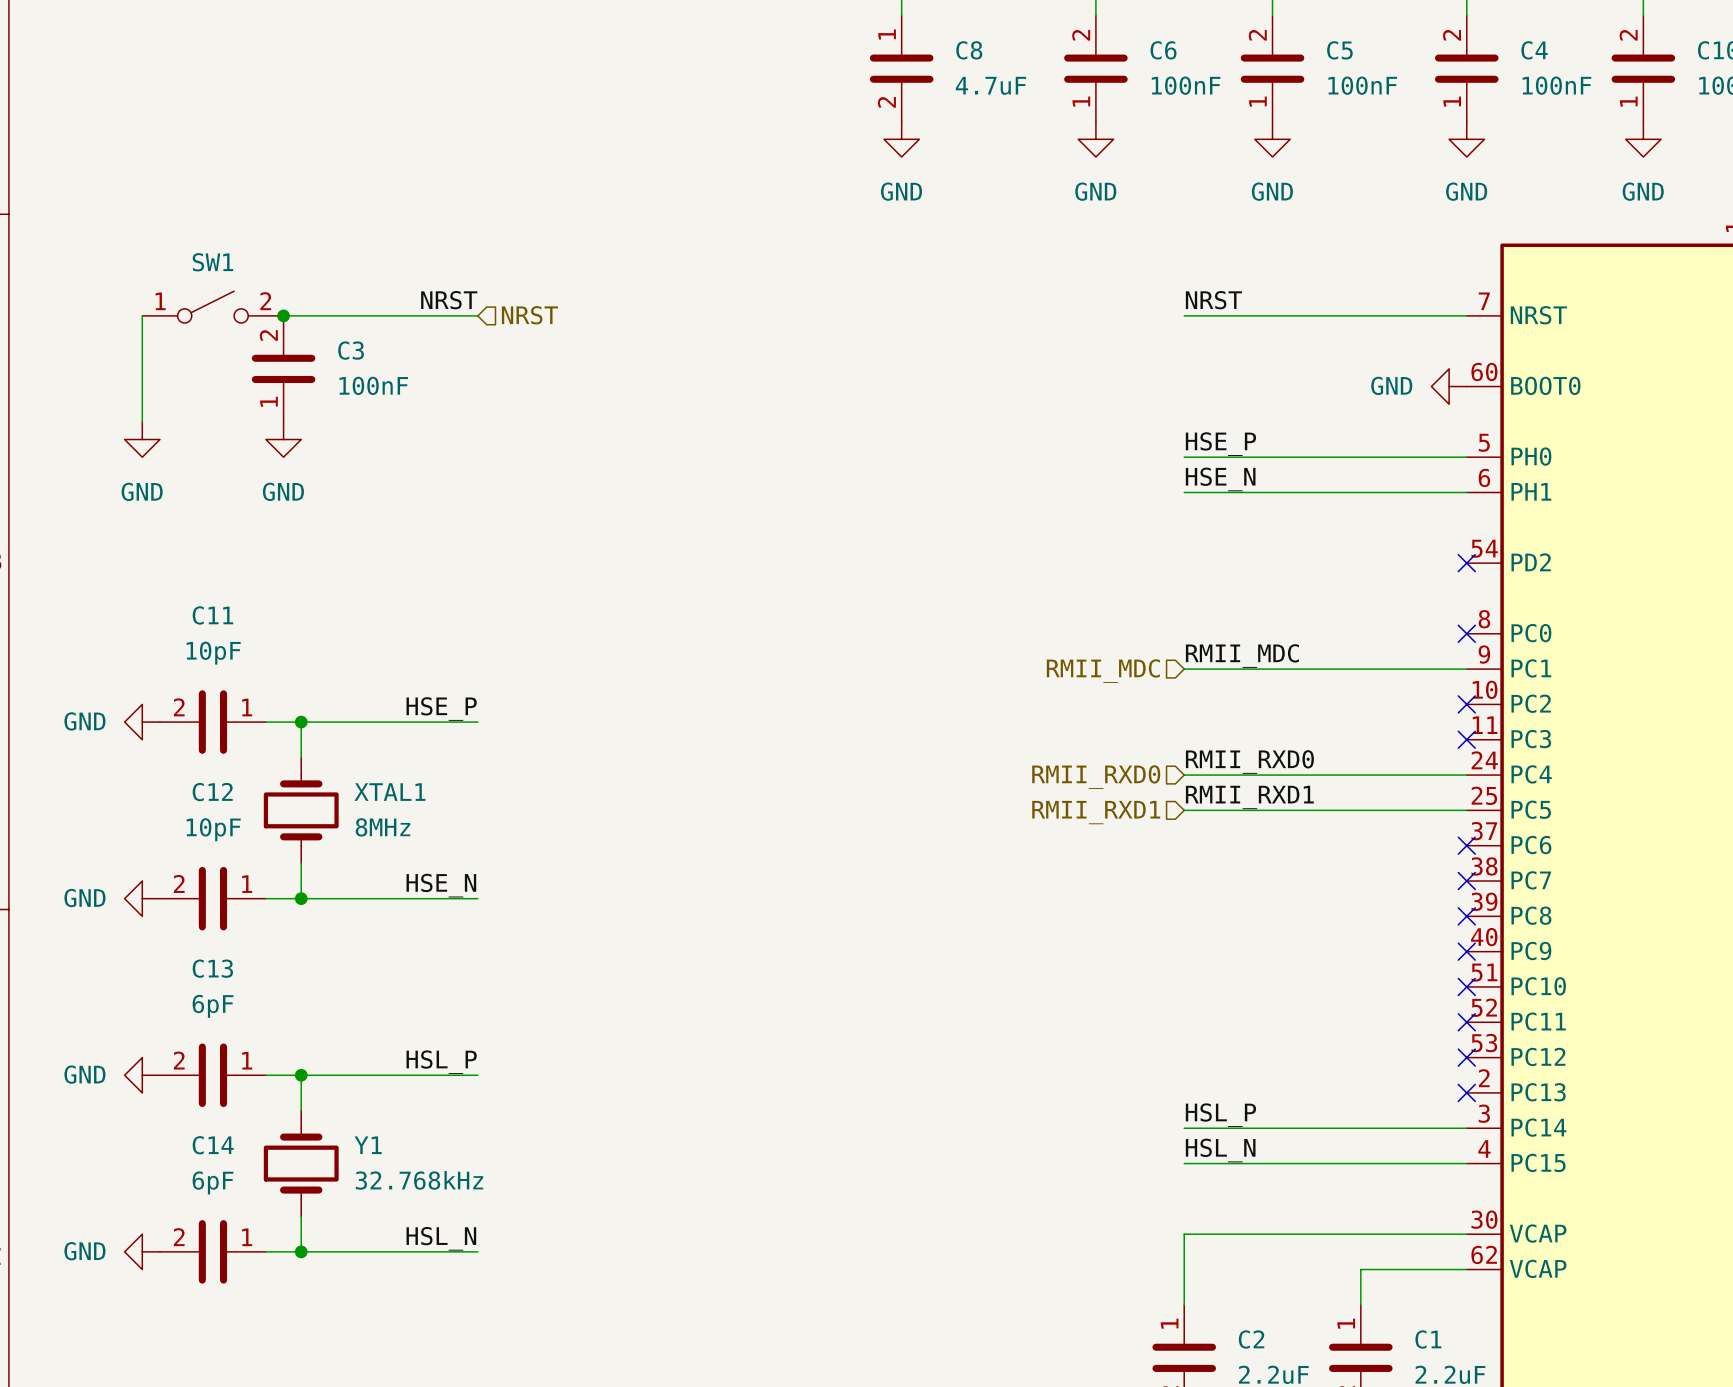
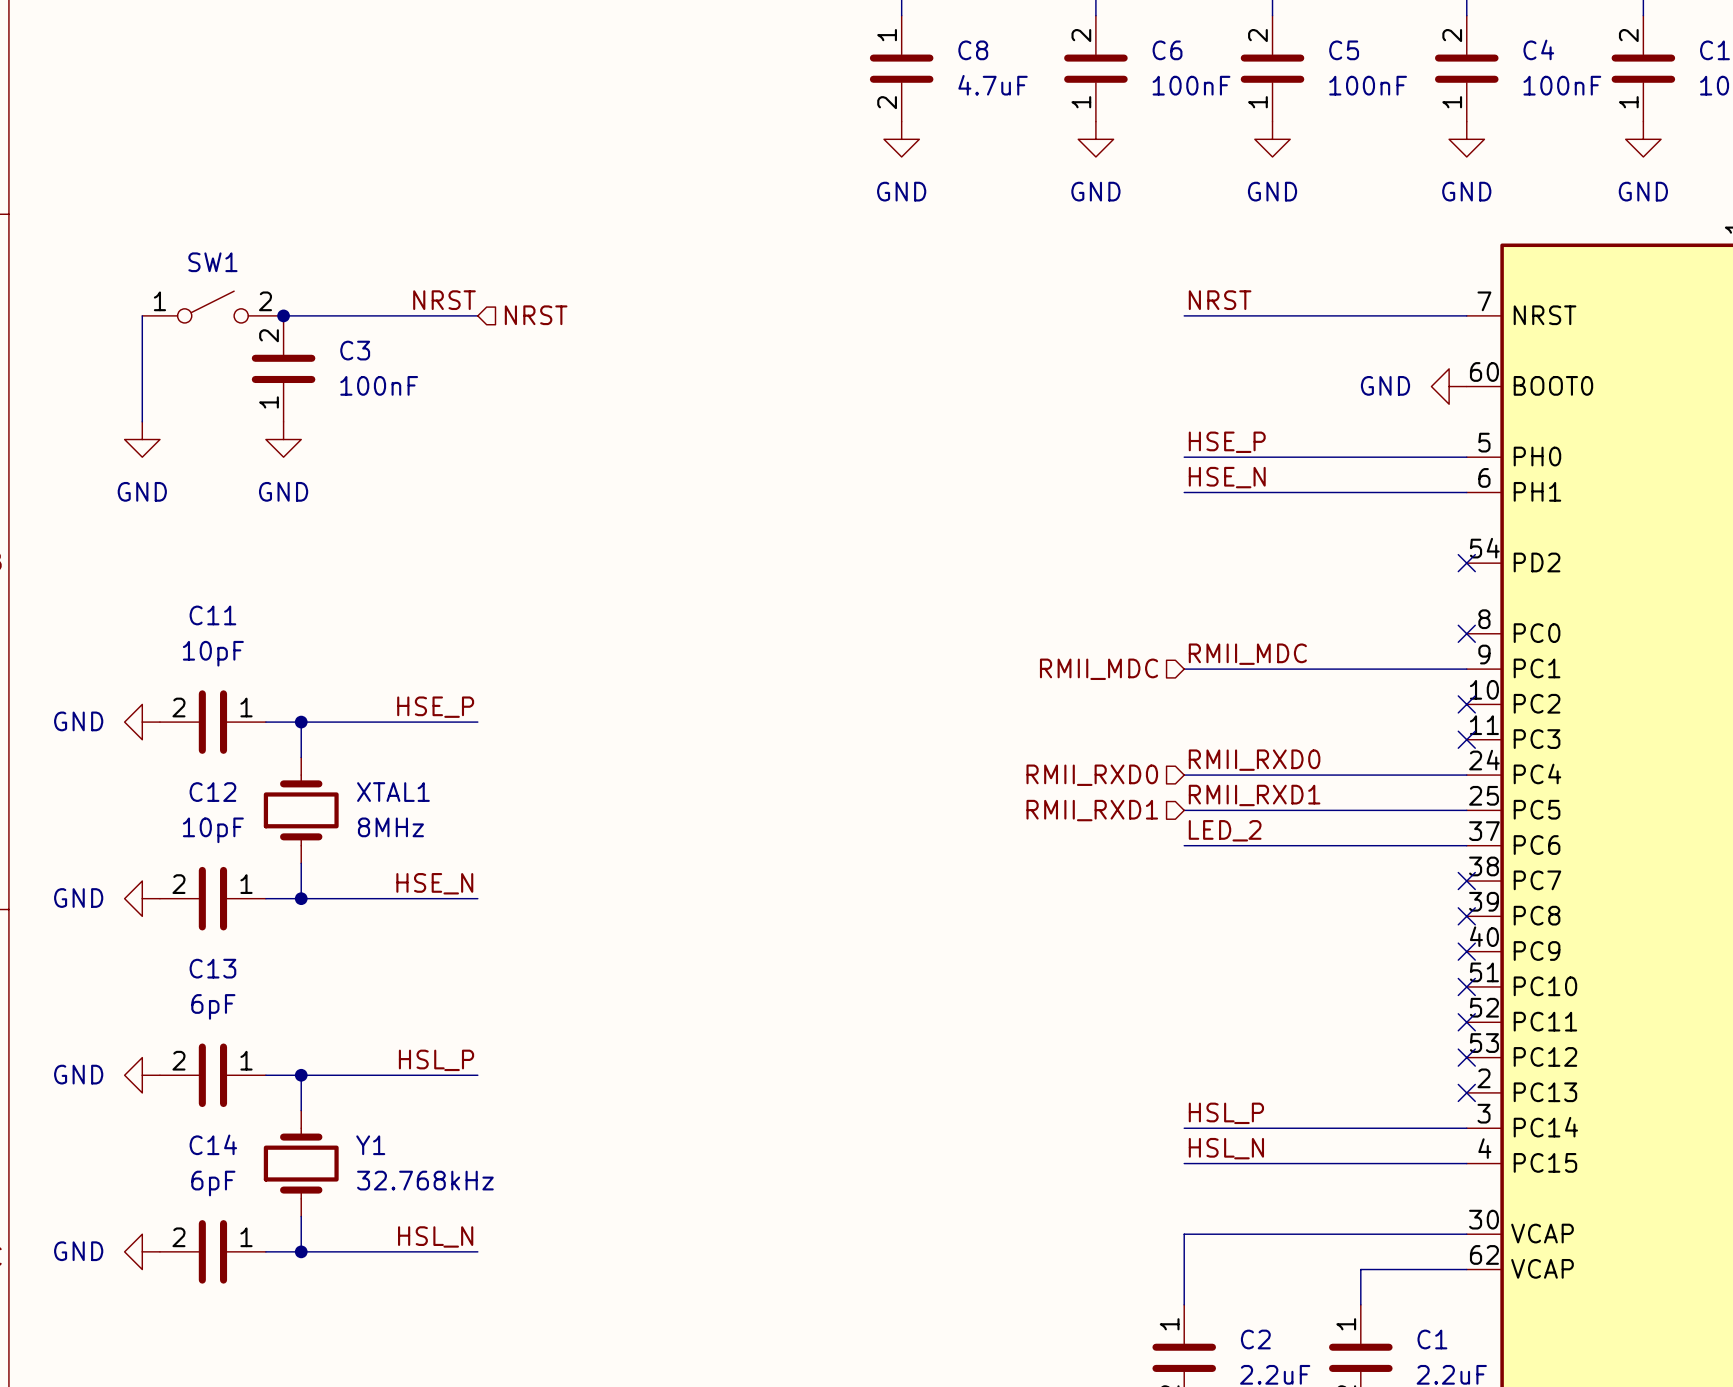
label: none -> LED_2 (1225, 830)
wire: none -> (1184, 845) (1466, 845)
no-connect mark: (1466, 845) -> none

